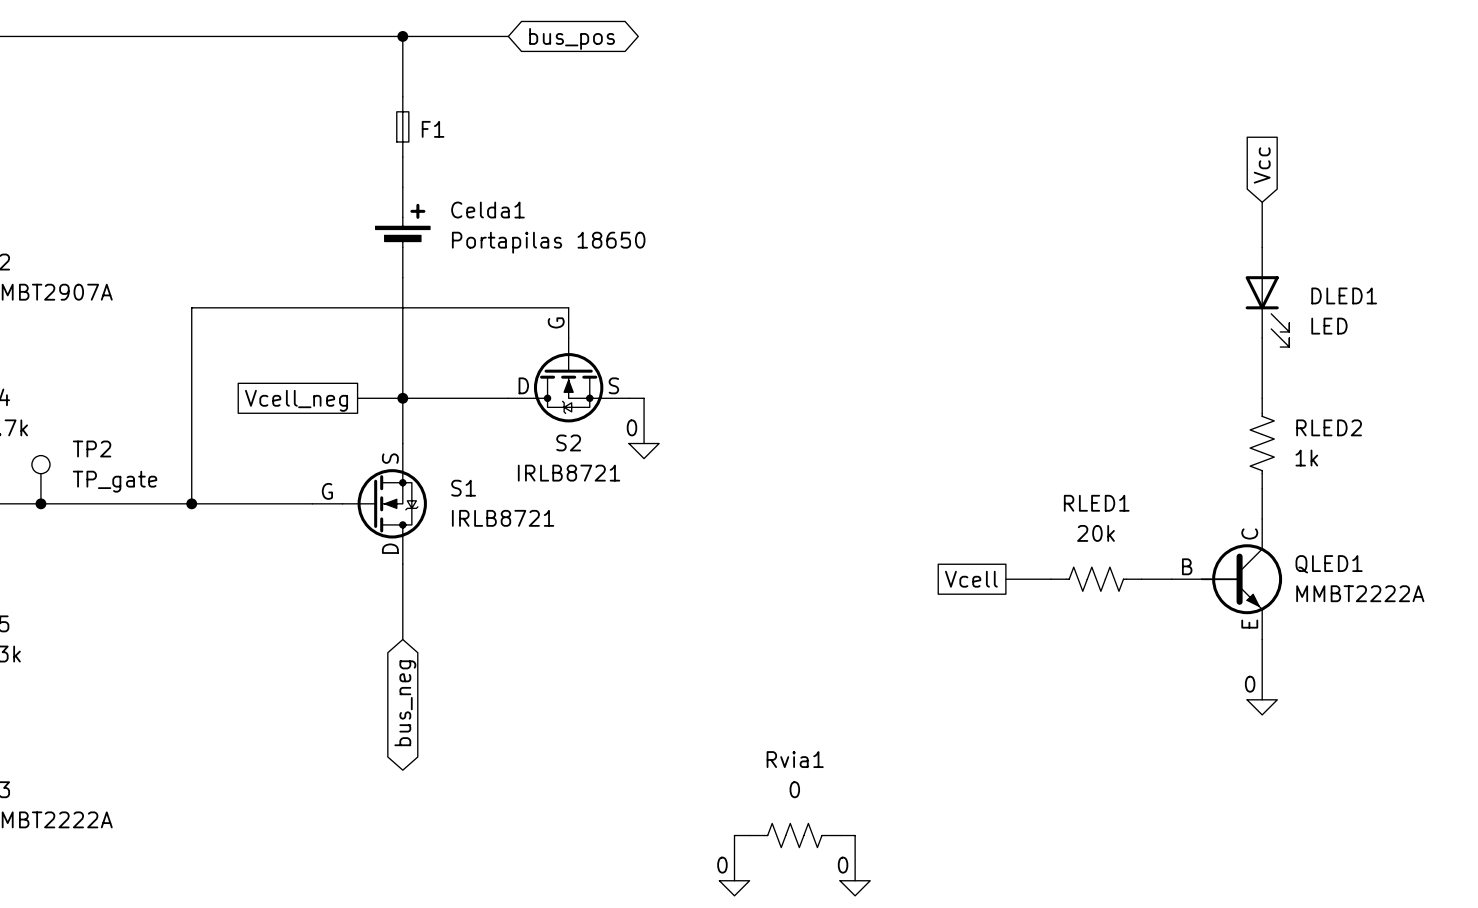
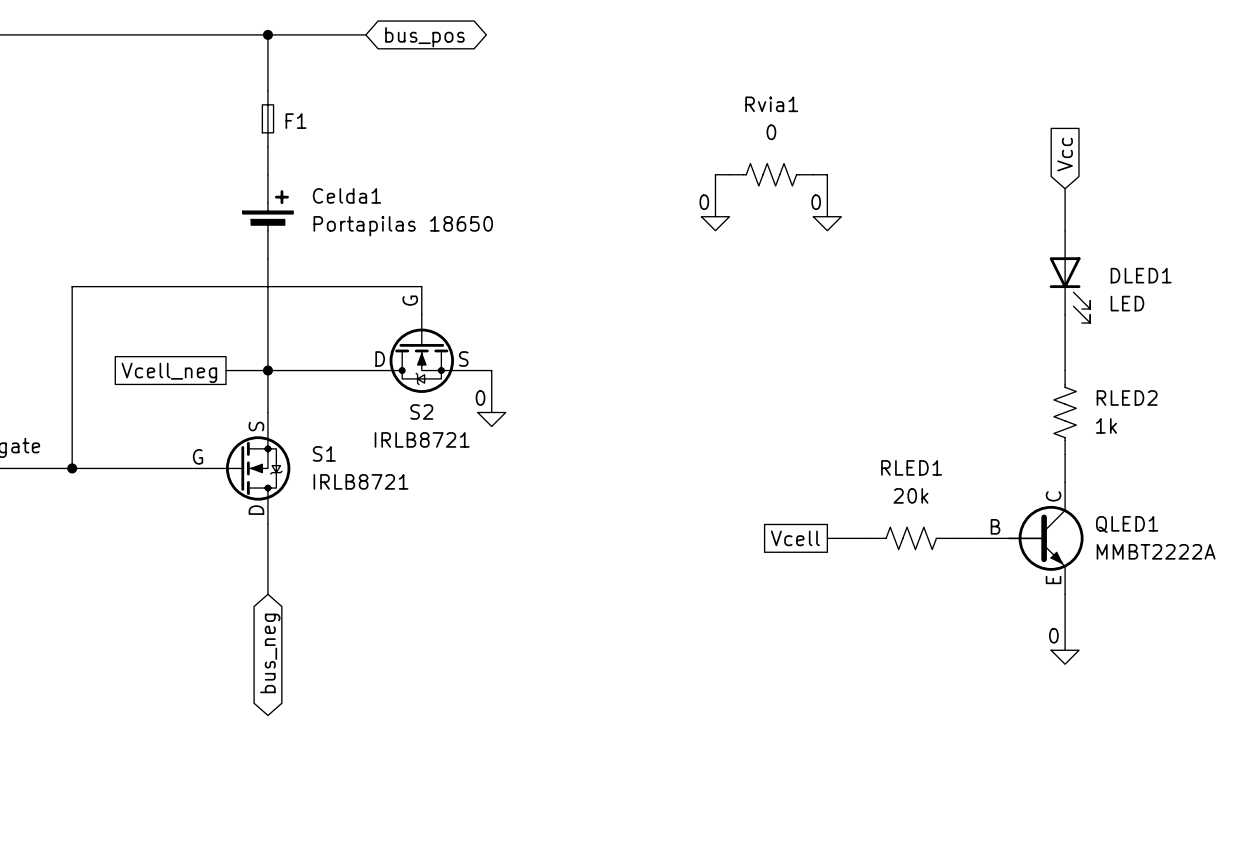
wire: none -> (729, 174) (715, 174) (715, 216)
wire: none -> (813, 174) (827, 174) (827, 216)
power symbol: none -> 0 (715, 223)
power symbol: none -> 0 (827, 223)
wire: (749, 835) (734, 835) (734, 880) -> none
Rvia1 position: (794, 835) -> (771, 174)
wire: (840, 835) (855, 835) (855, 880) -> none
power symbol: 0 (734, 888) -> none
power symbol: 0 (855, 888) -> none

